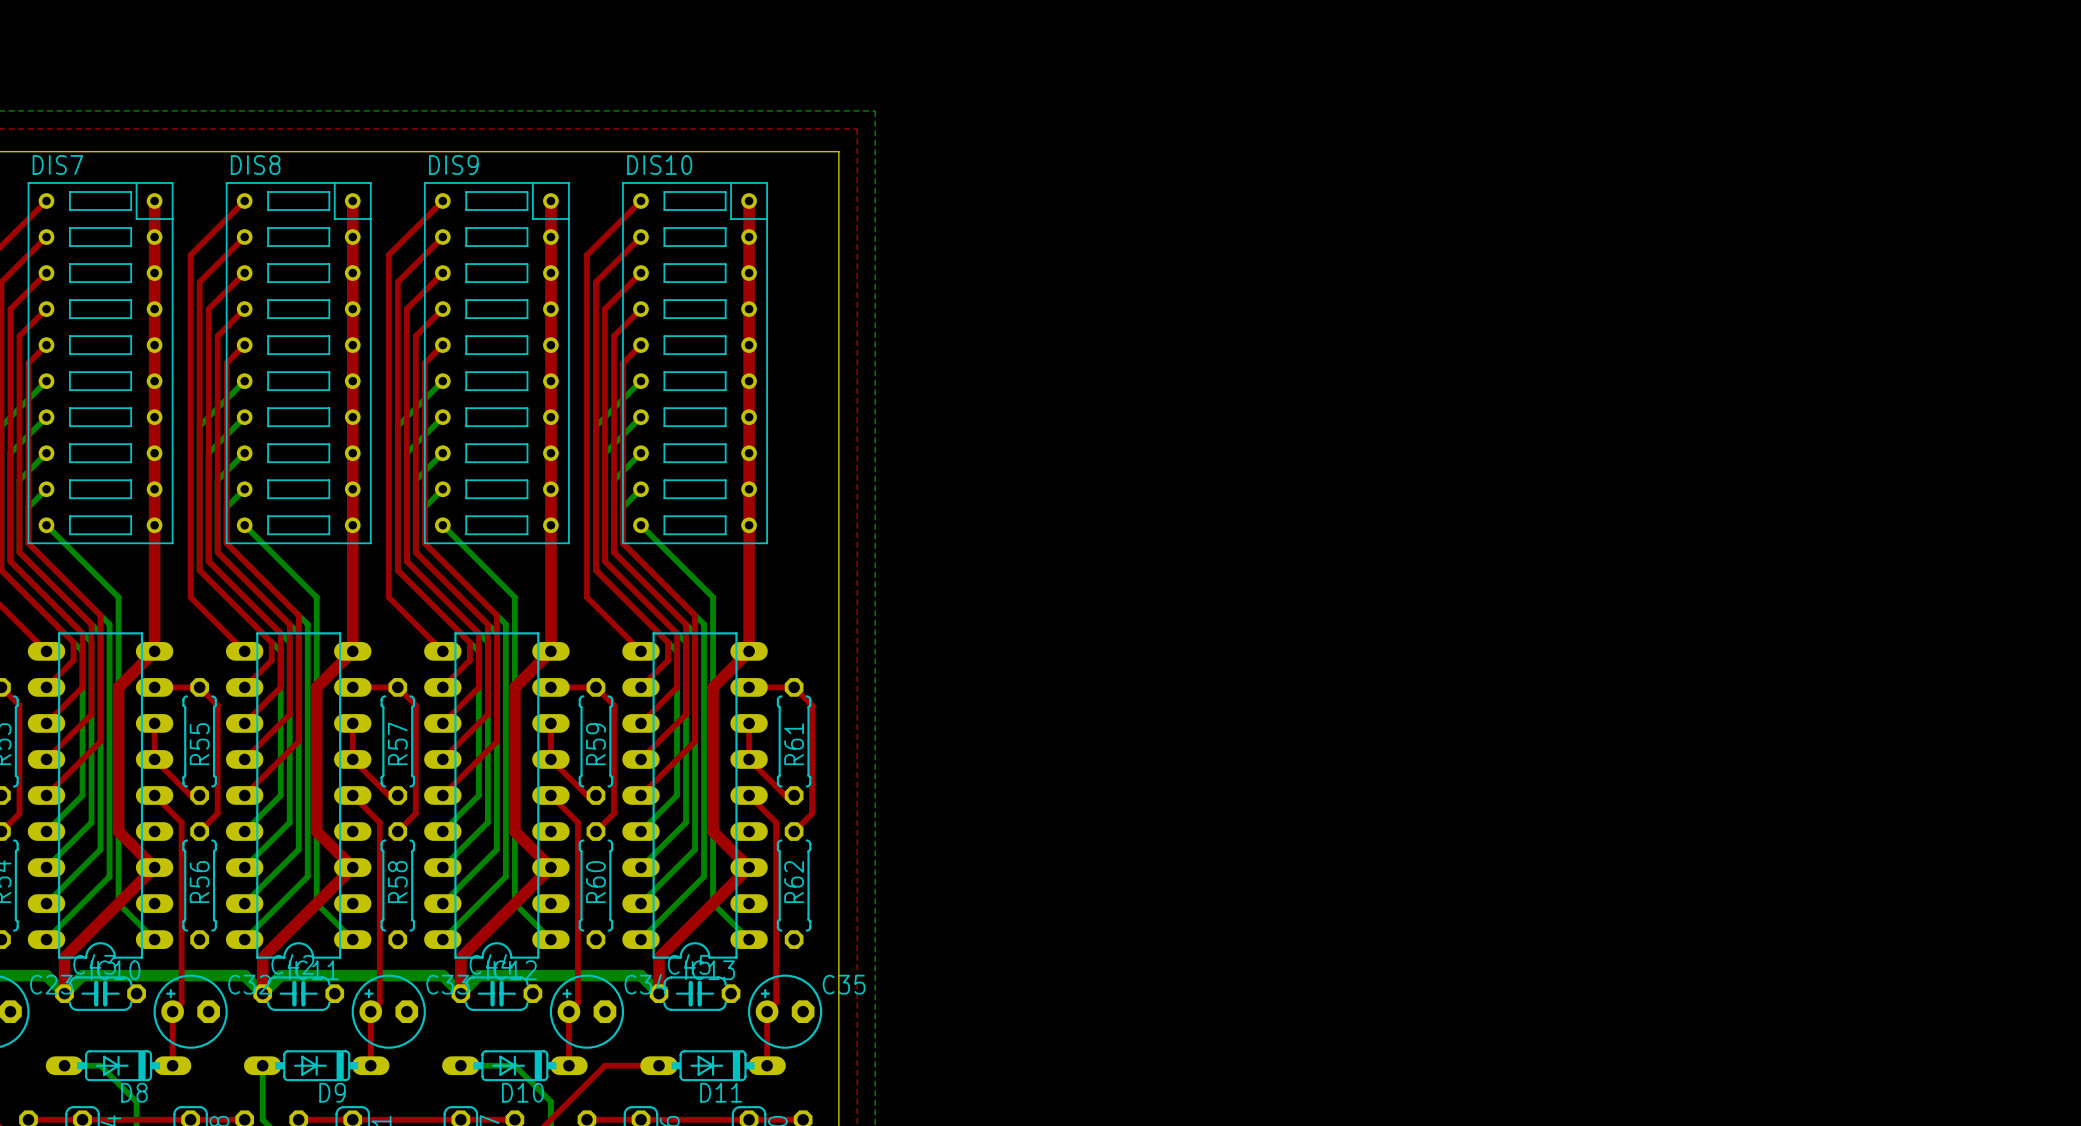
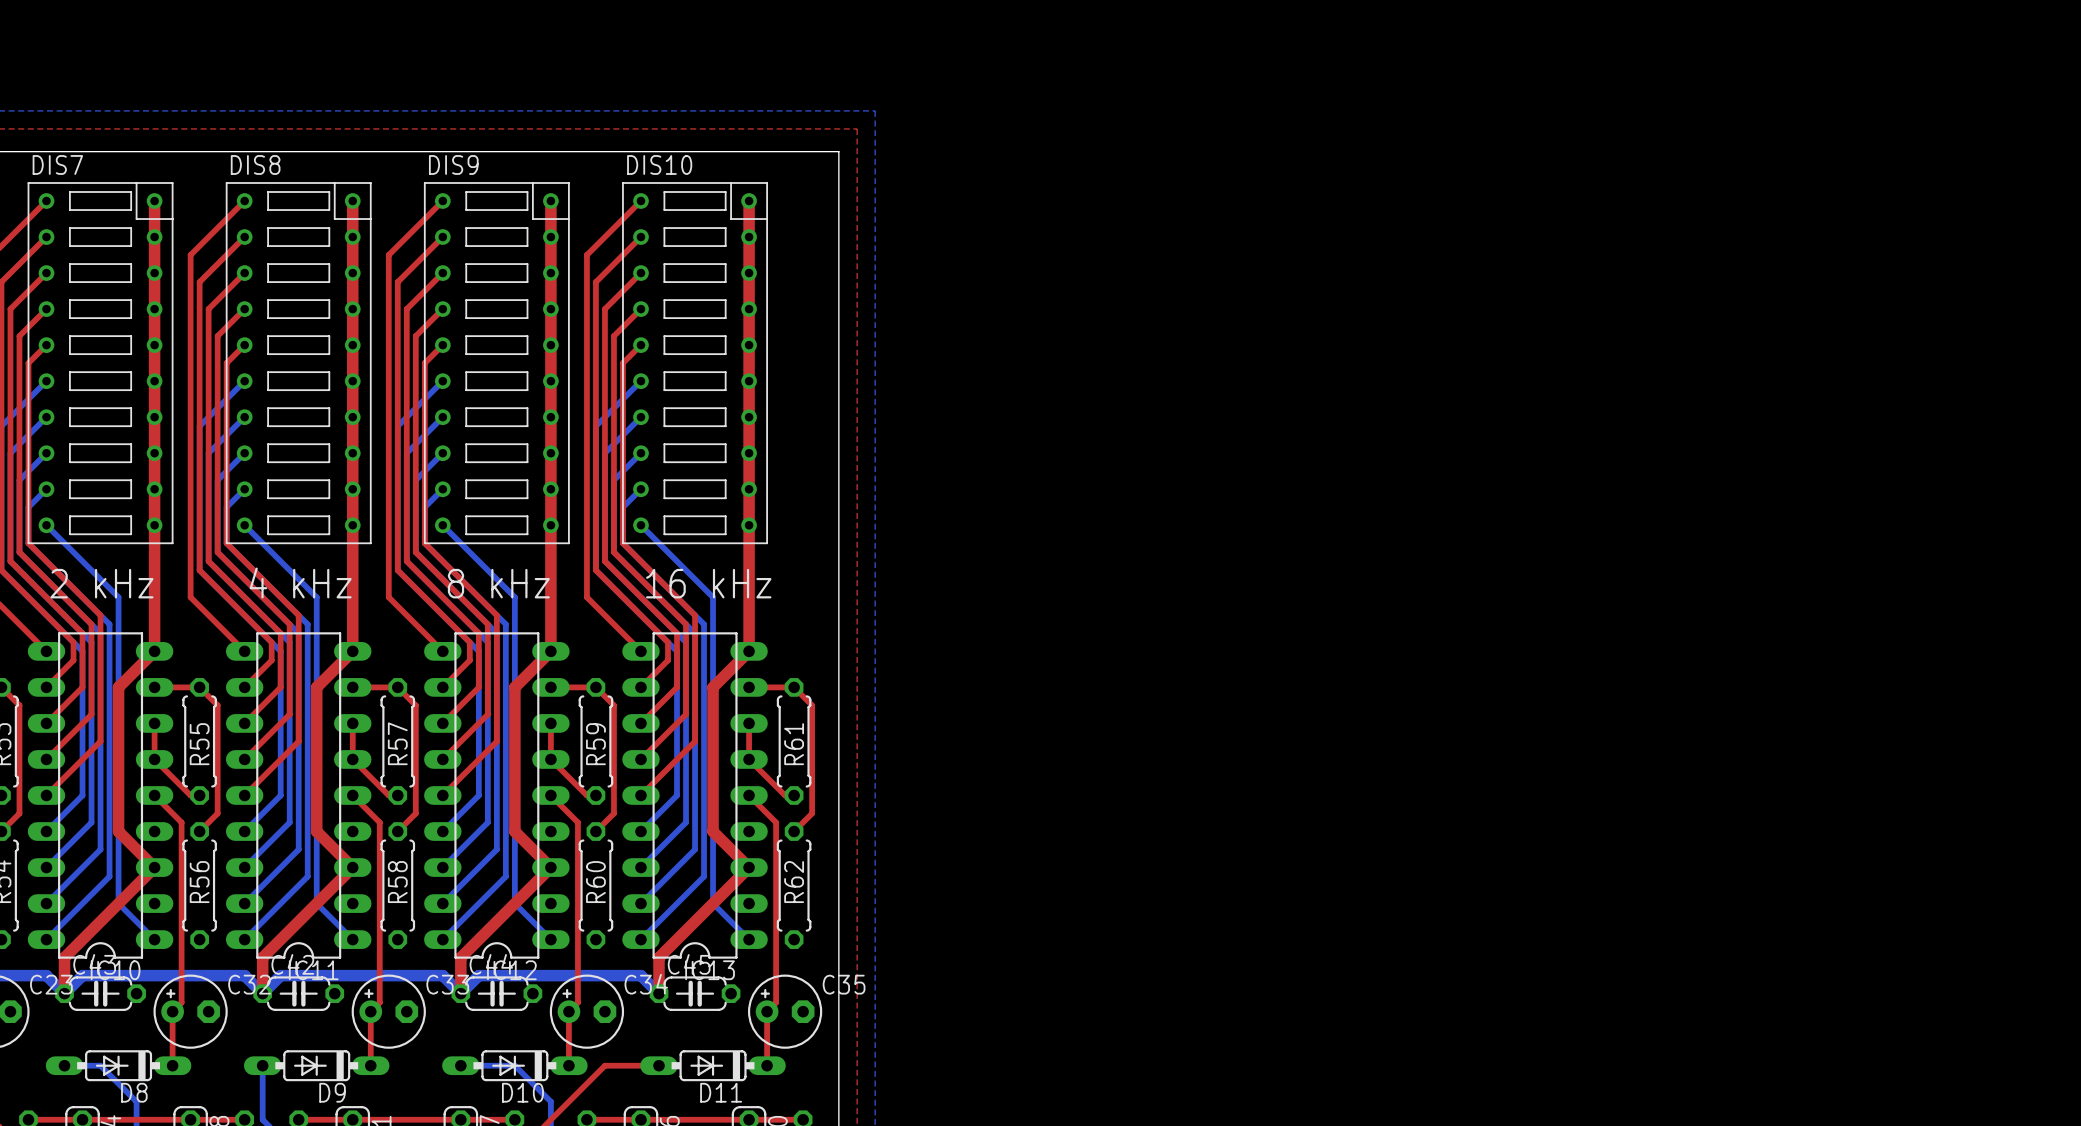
text: none -> 4 kHz (300, 582)
text: none -> 2 kHz (101, 583)
text: none -> 8 kHz (498, 583)
text: none -> 16 kHz (708, 583)

